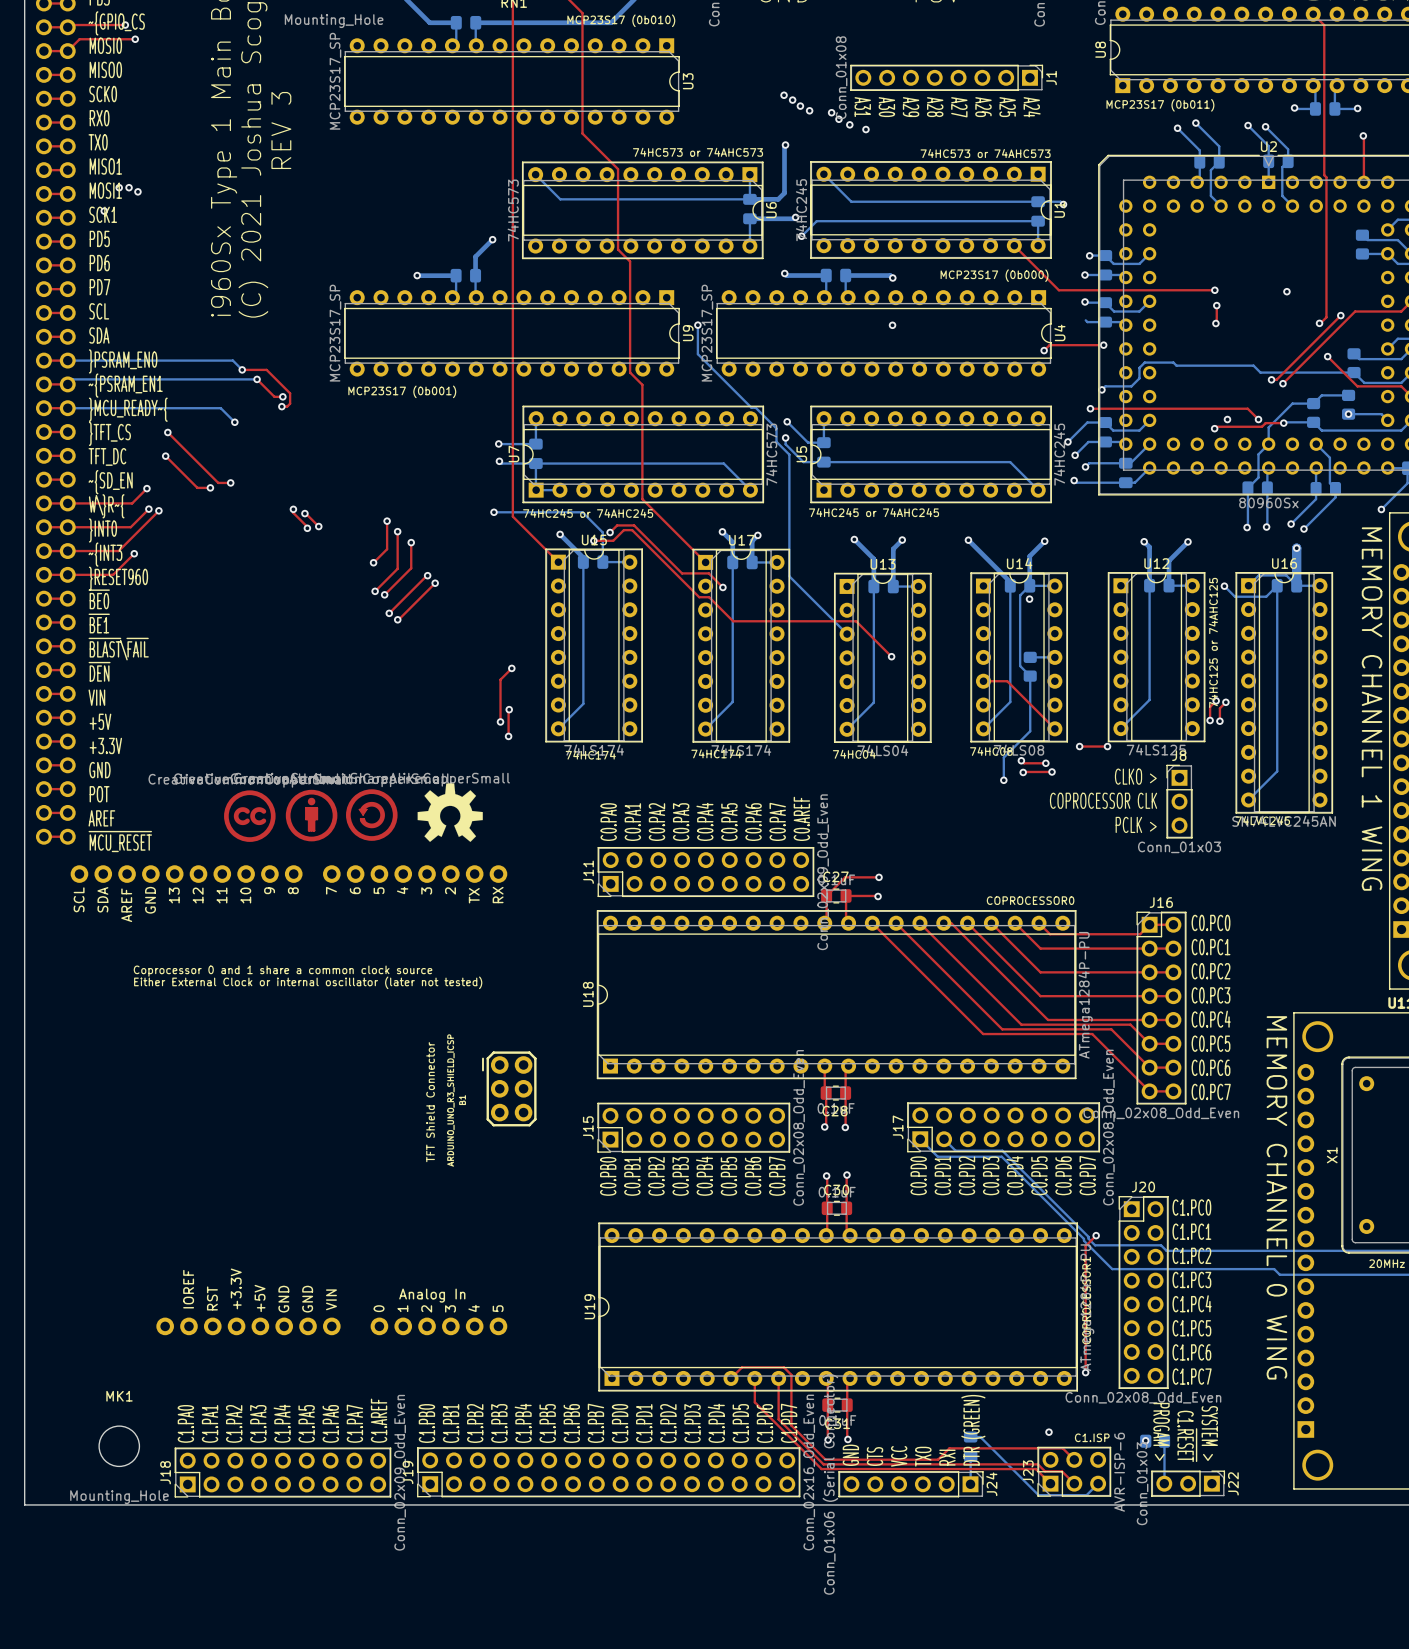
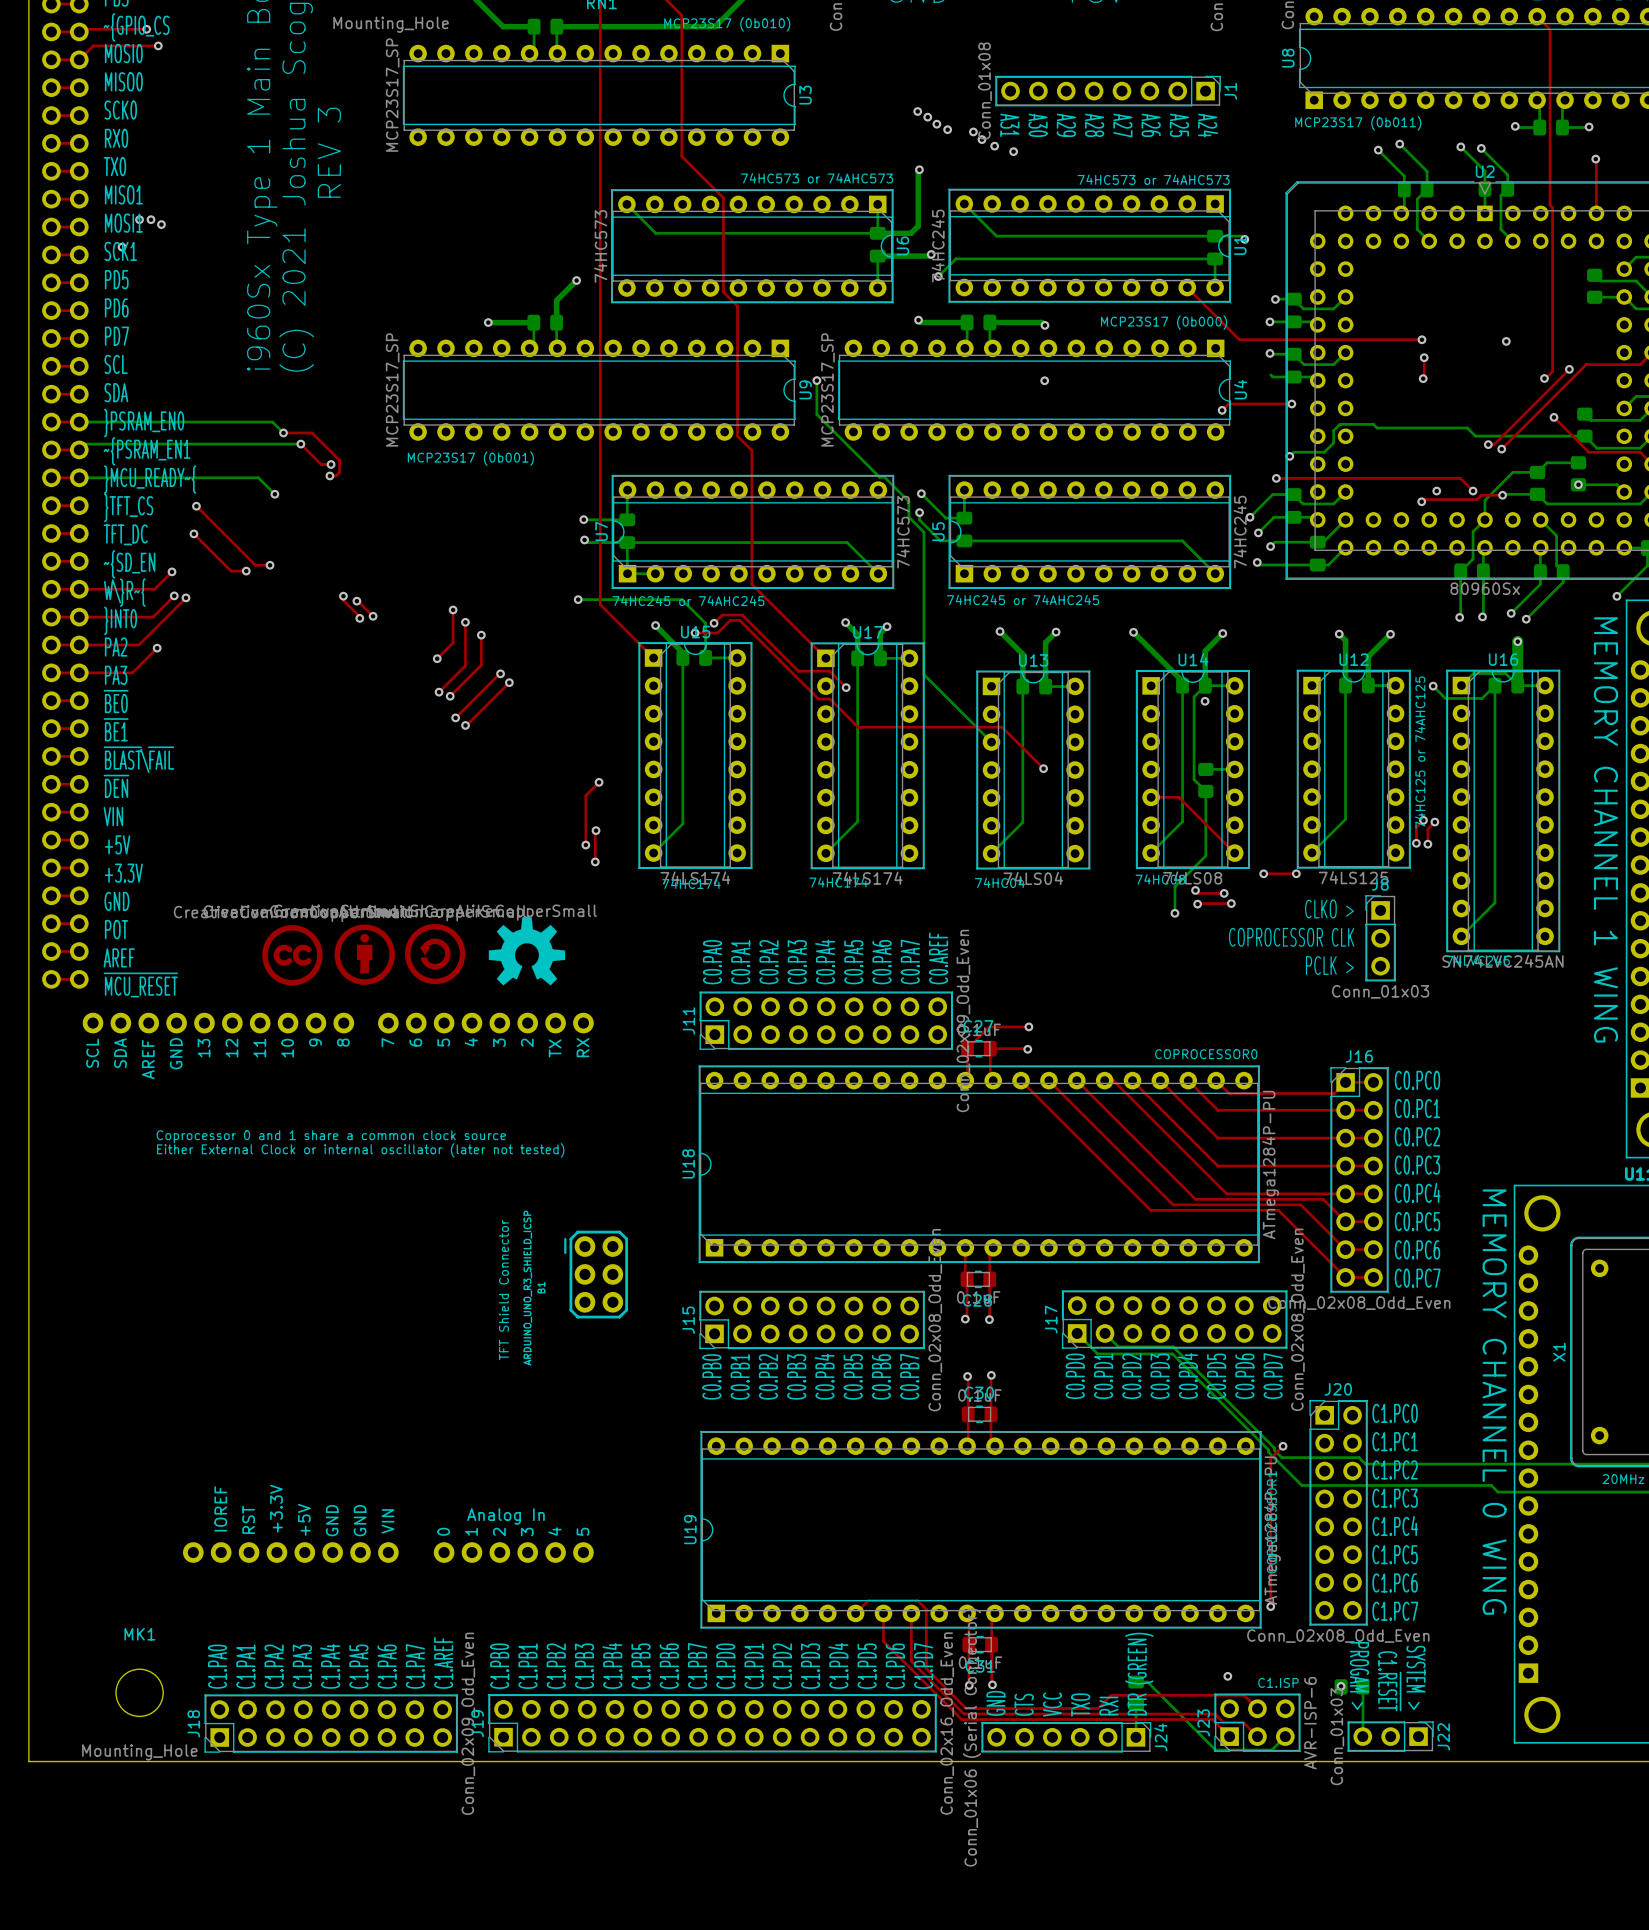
text: ~{INT3 (105, 554) -> PA2 (116, 647)
text: }RESET960 (118, 578) -> PA3 (116, 675)

